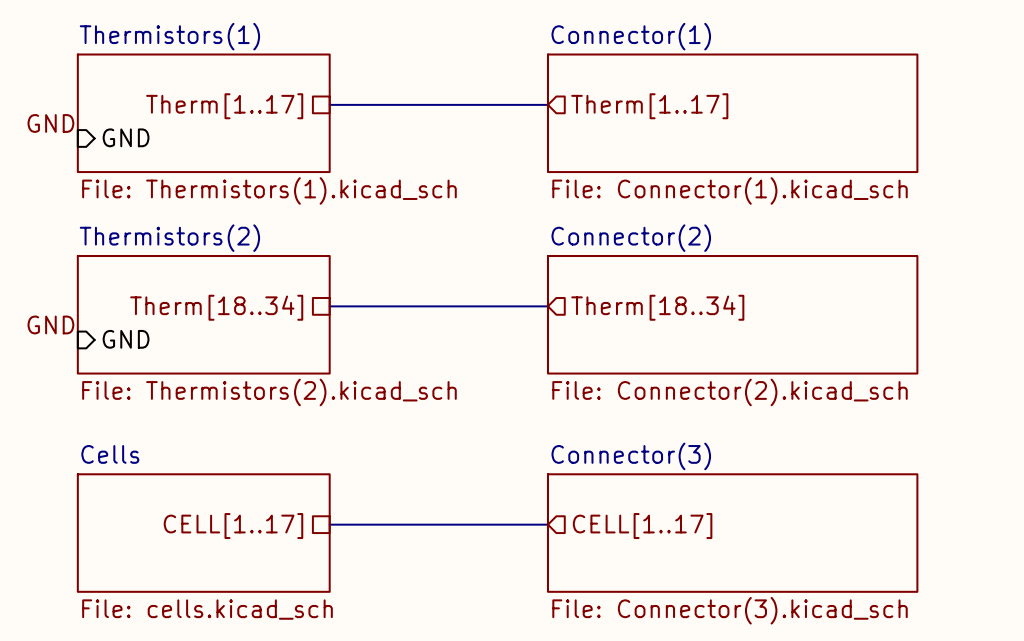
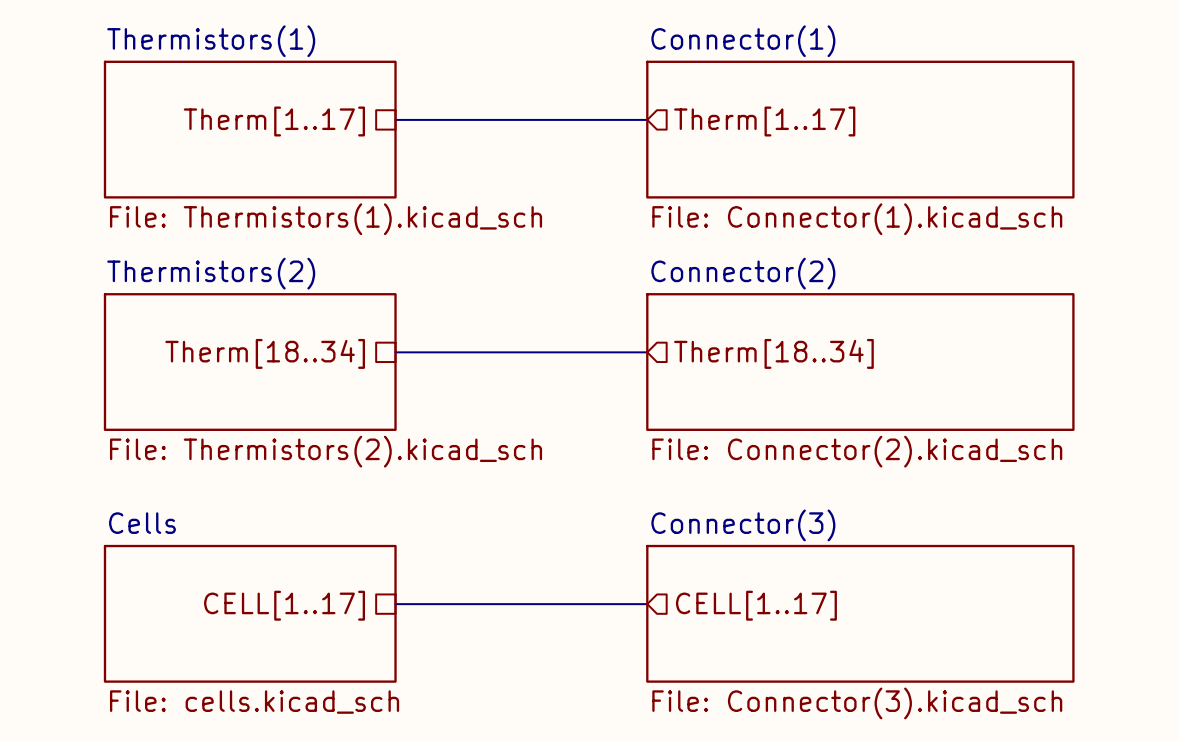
label: GND (50, 123) -> none
sheet pin: GND (126, 137) -> none
label: GND (50, 324) -> none
sheet pin: GND (126, 339) -> none

